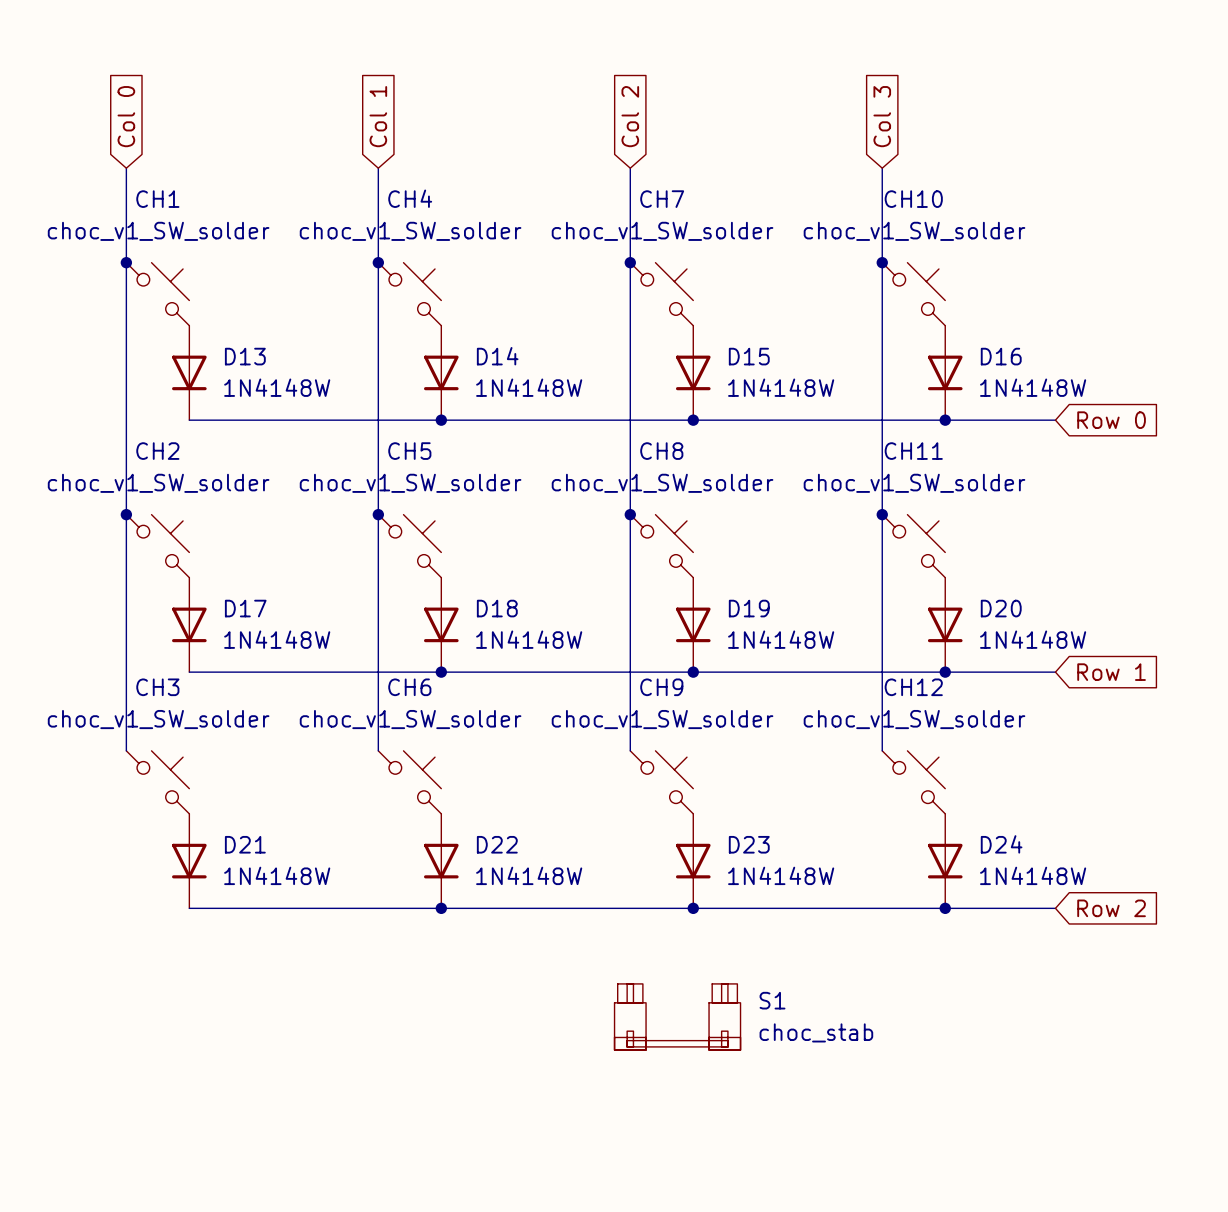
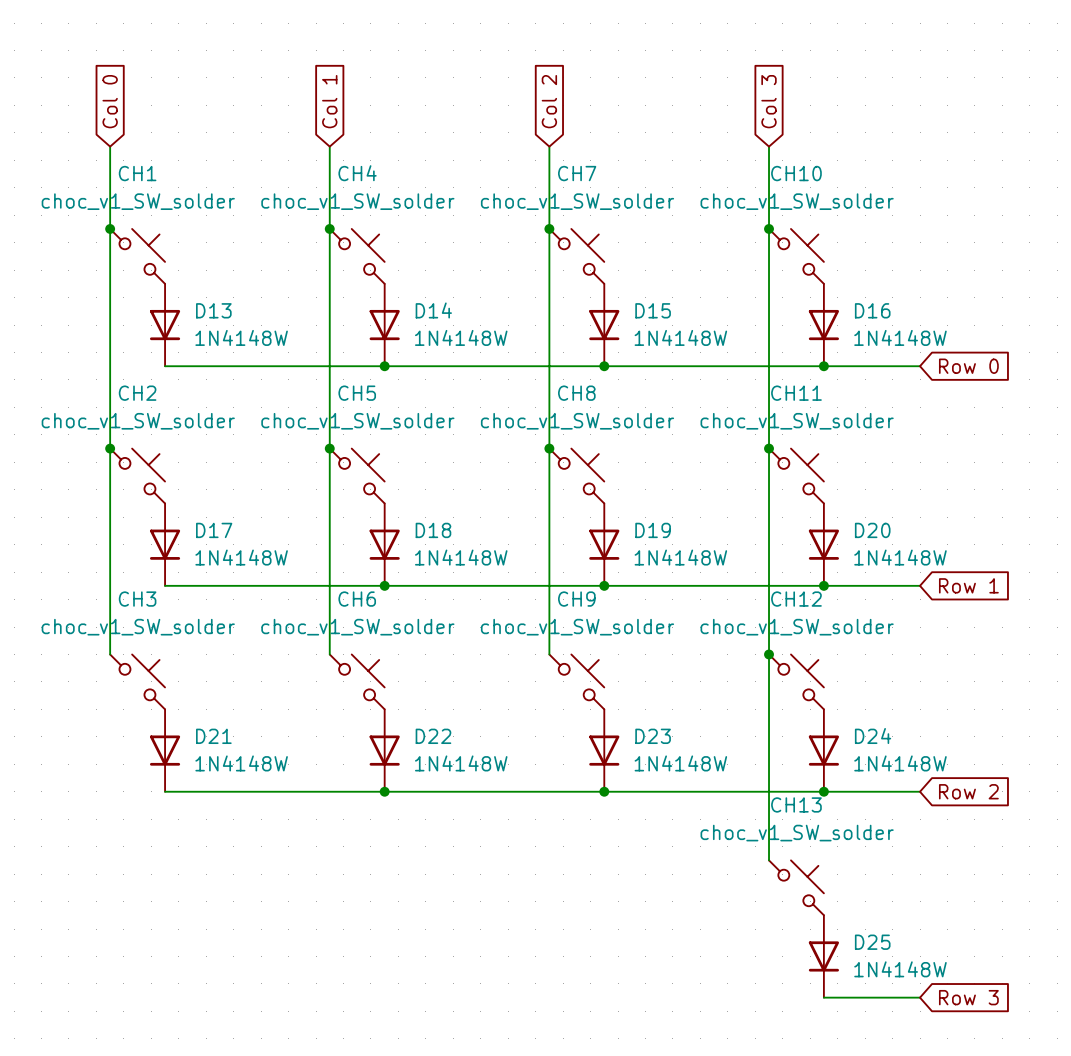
wire: none -> (769, 654) (769, 860)
junction: none -> (769, 654)
S1: choc_stab (677, 1017) -> none
CH13: none -> choc_v1_SW_solder (796, 887)
D25: none -> 1N4148W (823, 956)
wire: none -> (823, 997) (920, 997)
global label: none -> Row 3 (968, 997)

